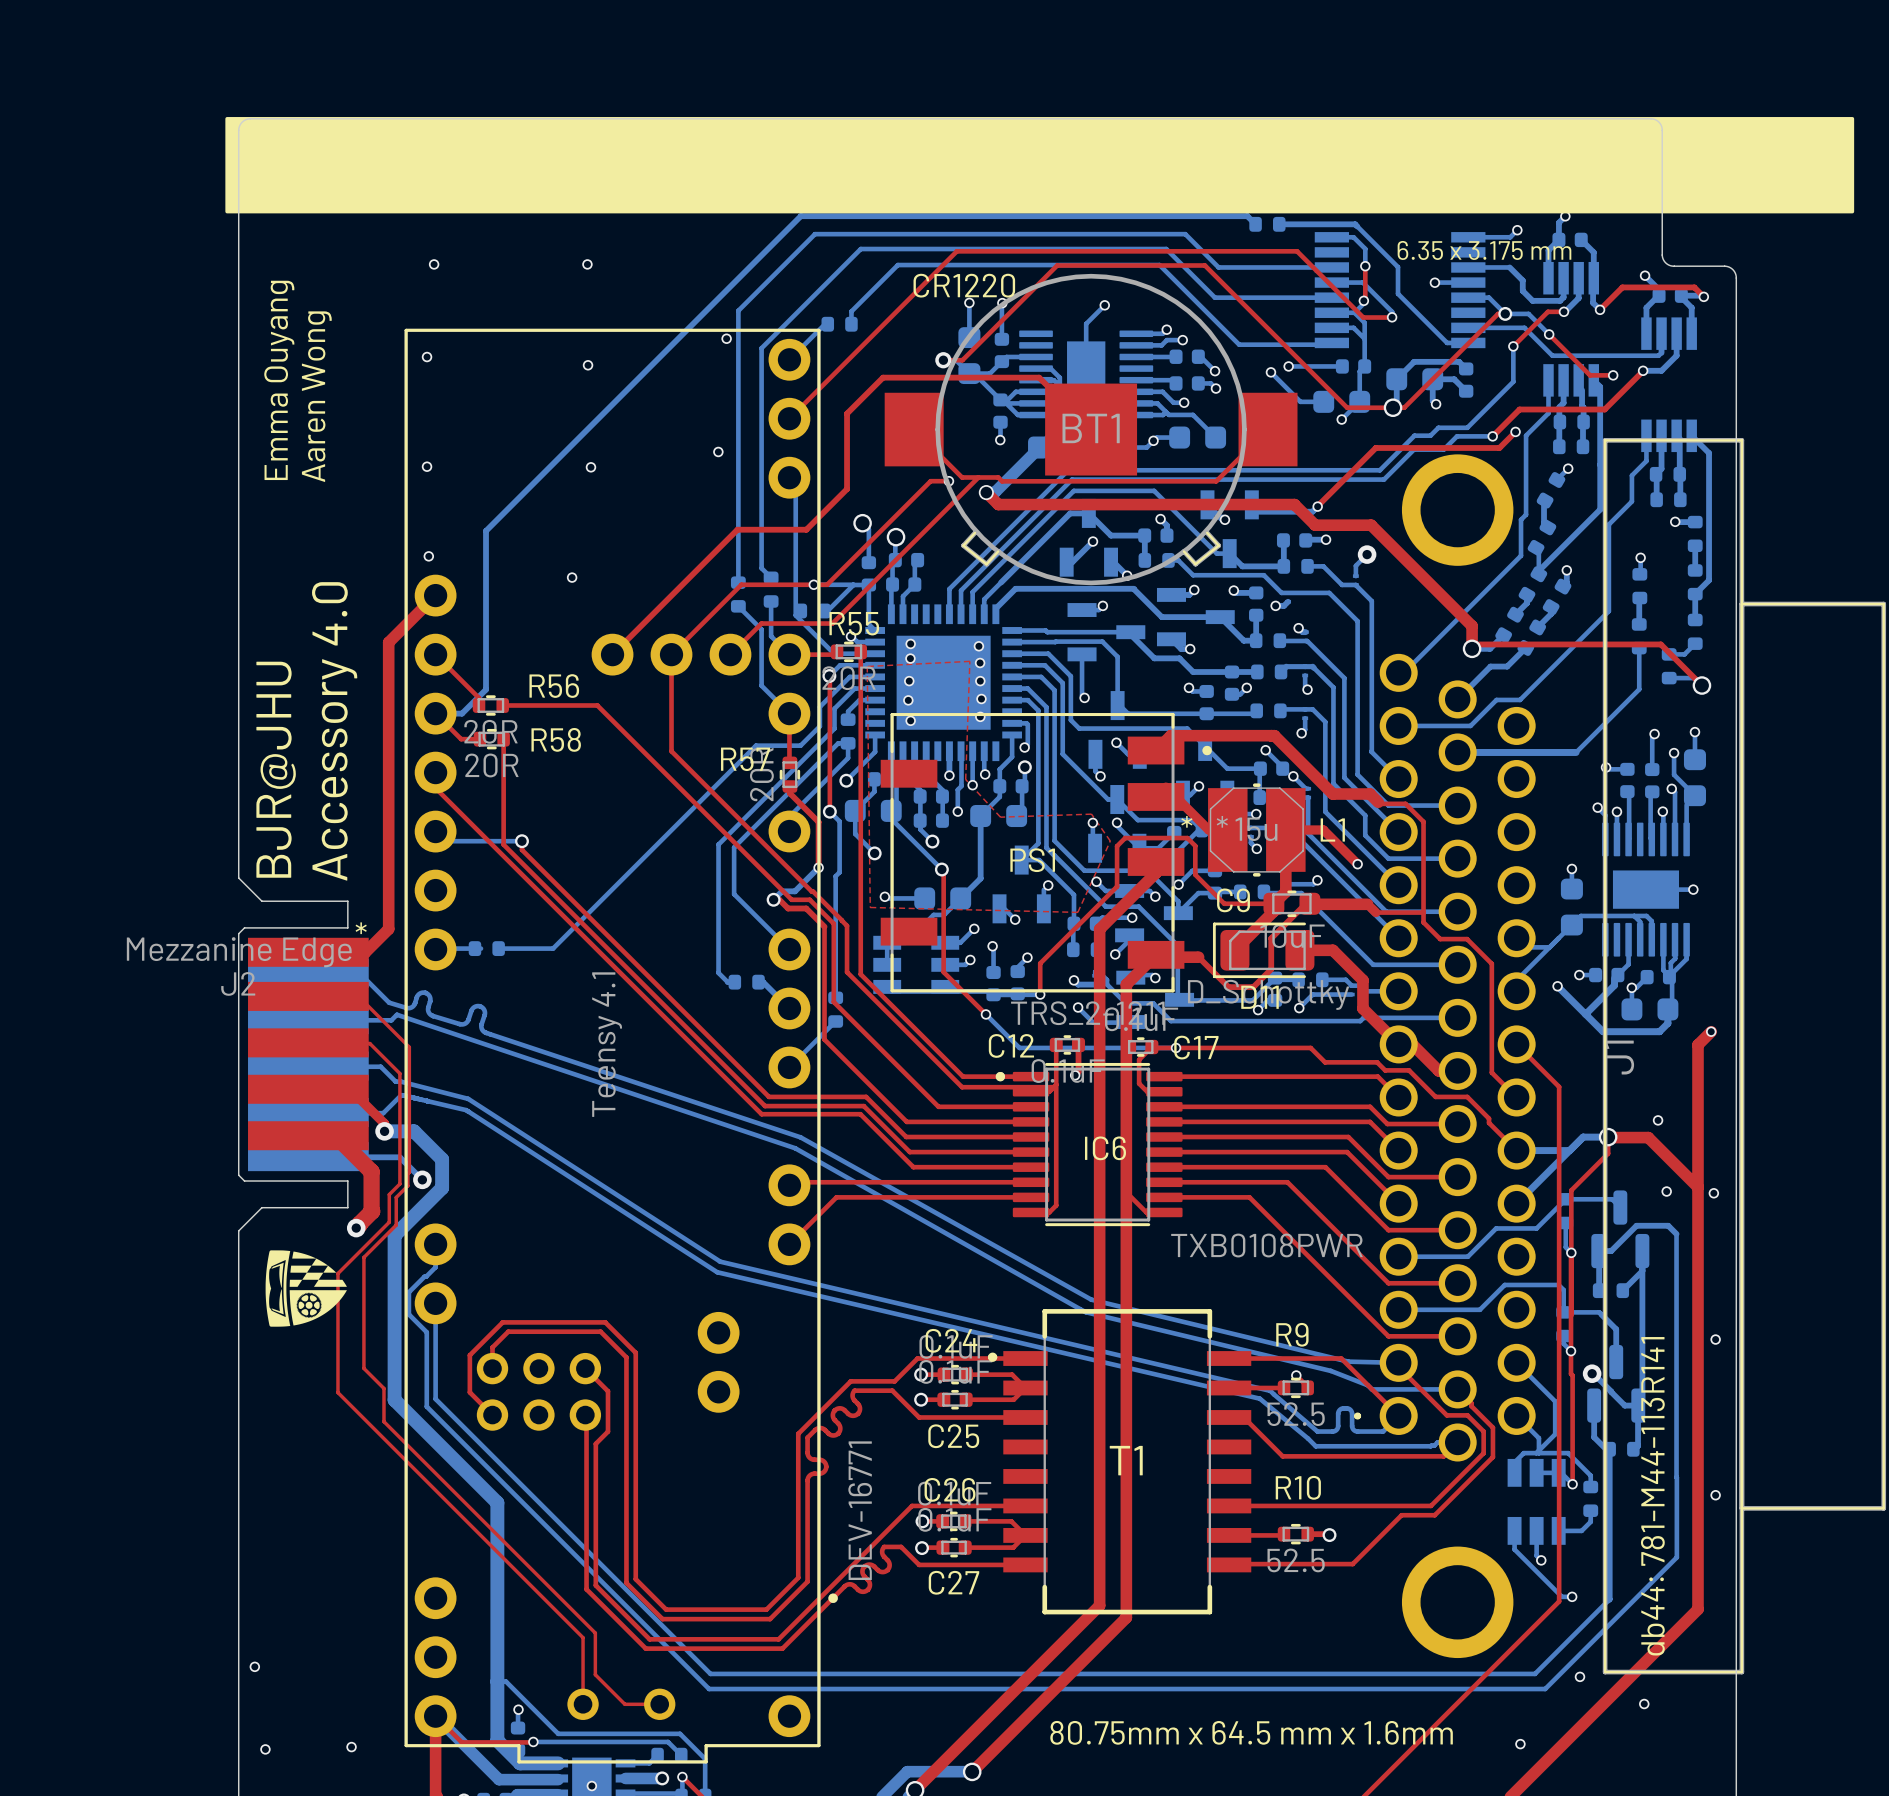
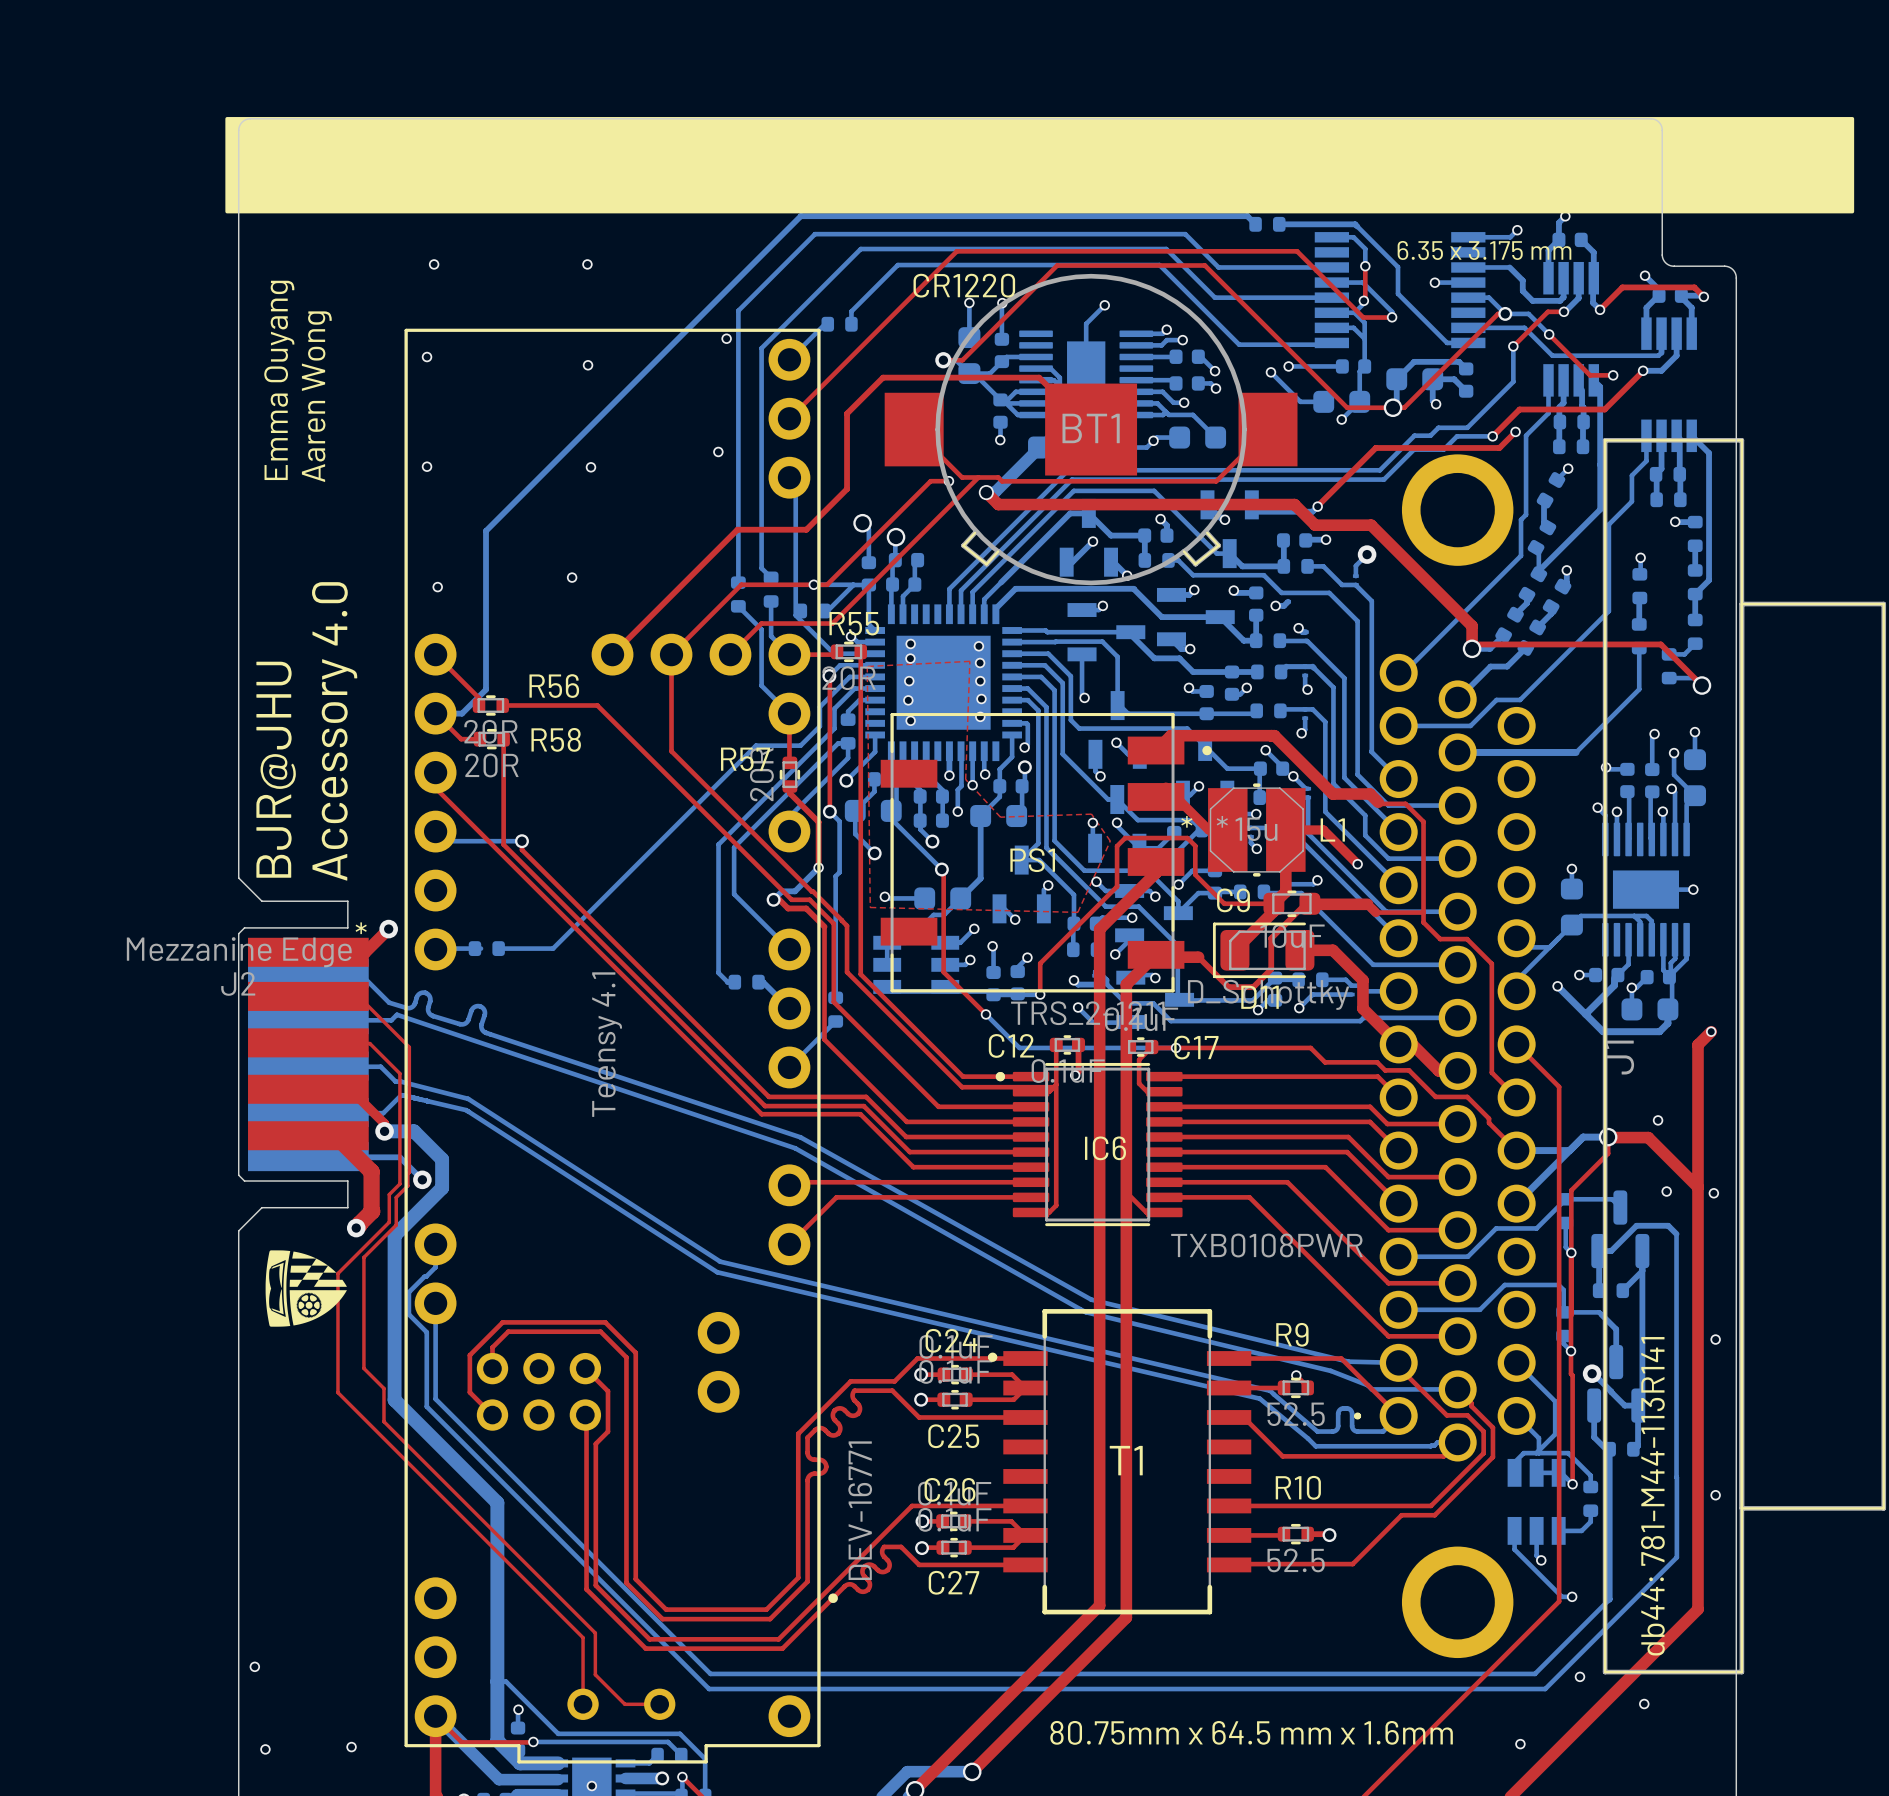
part footprint: [404, 328, 838, 1764] -> [404, 328, 838, 1764]
via position: (428, 556) -> (437, 587)
top track: (435, 595) (388, 642) (388, 929) -> none
via: none -> (388, 929)

